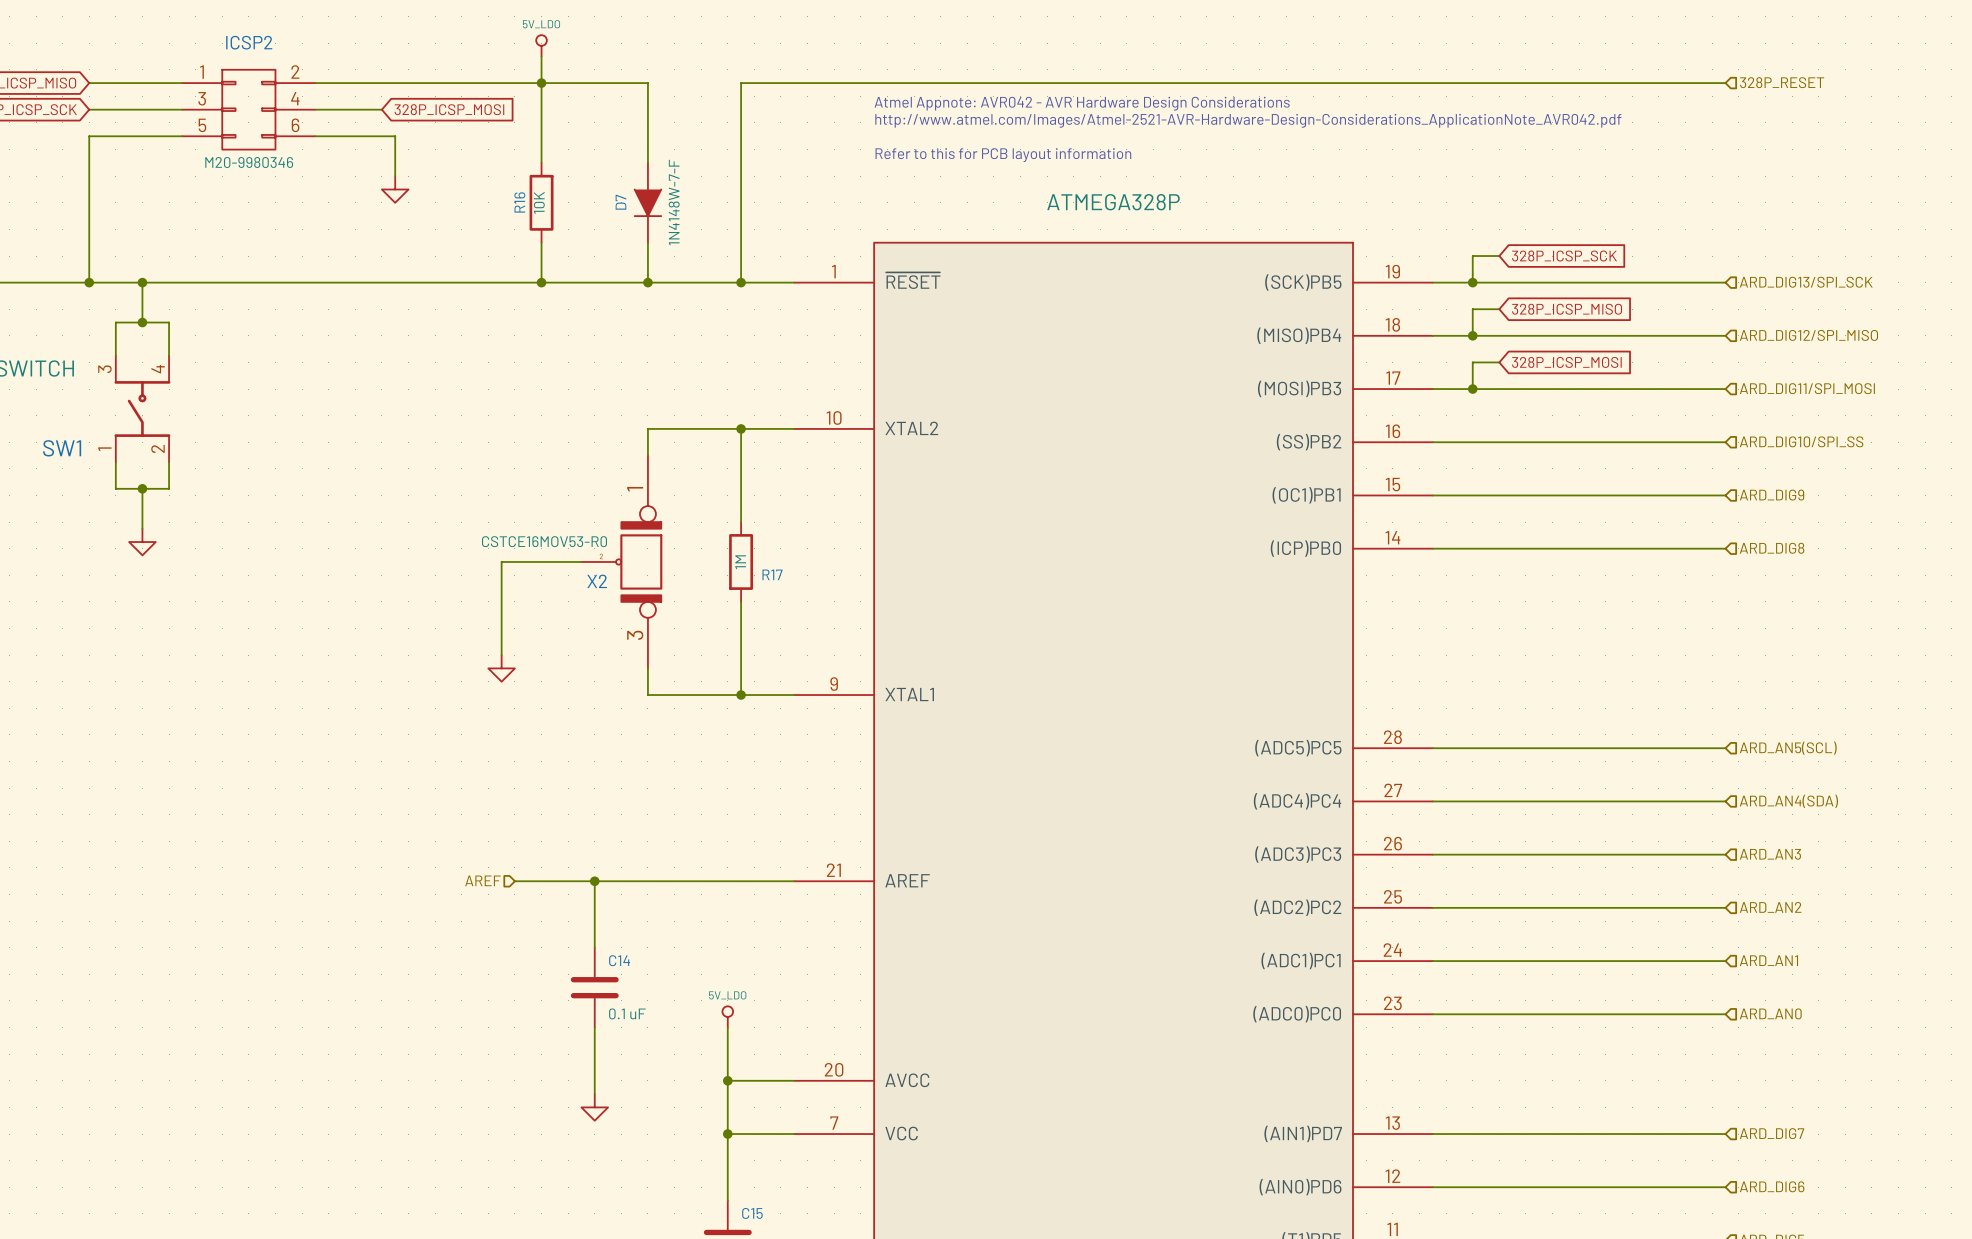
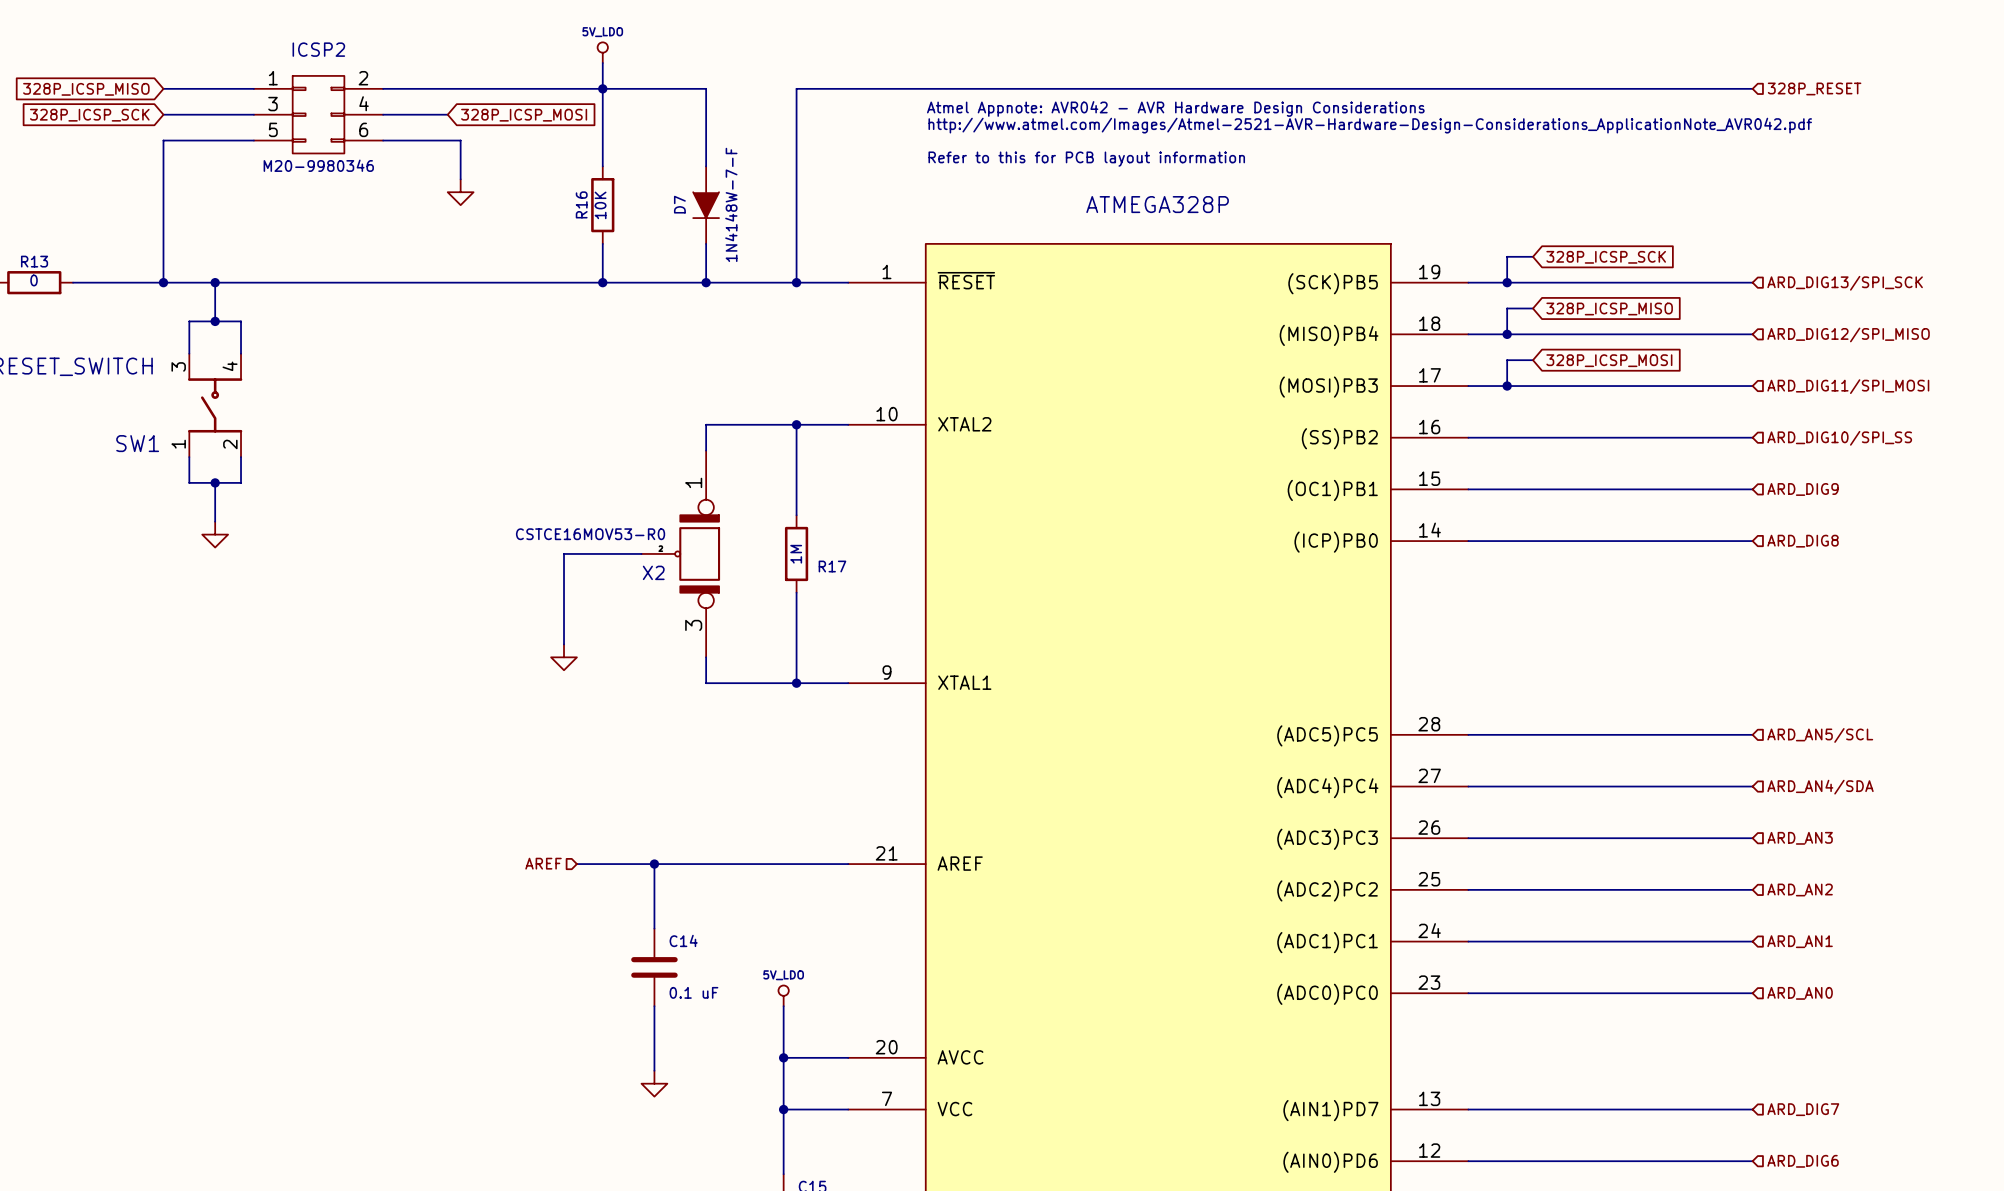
hierarchical label: ARD_AN5(SCL) (1788, 748) -> ARD_AN5/SCL (1820, 735)
hierarchical label: ARD_AN4(SDA) (1788, 801) -> ARD_AN4/SDA (1820, 787)

